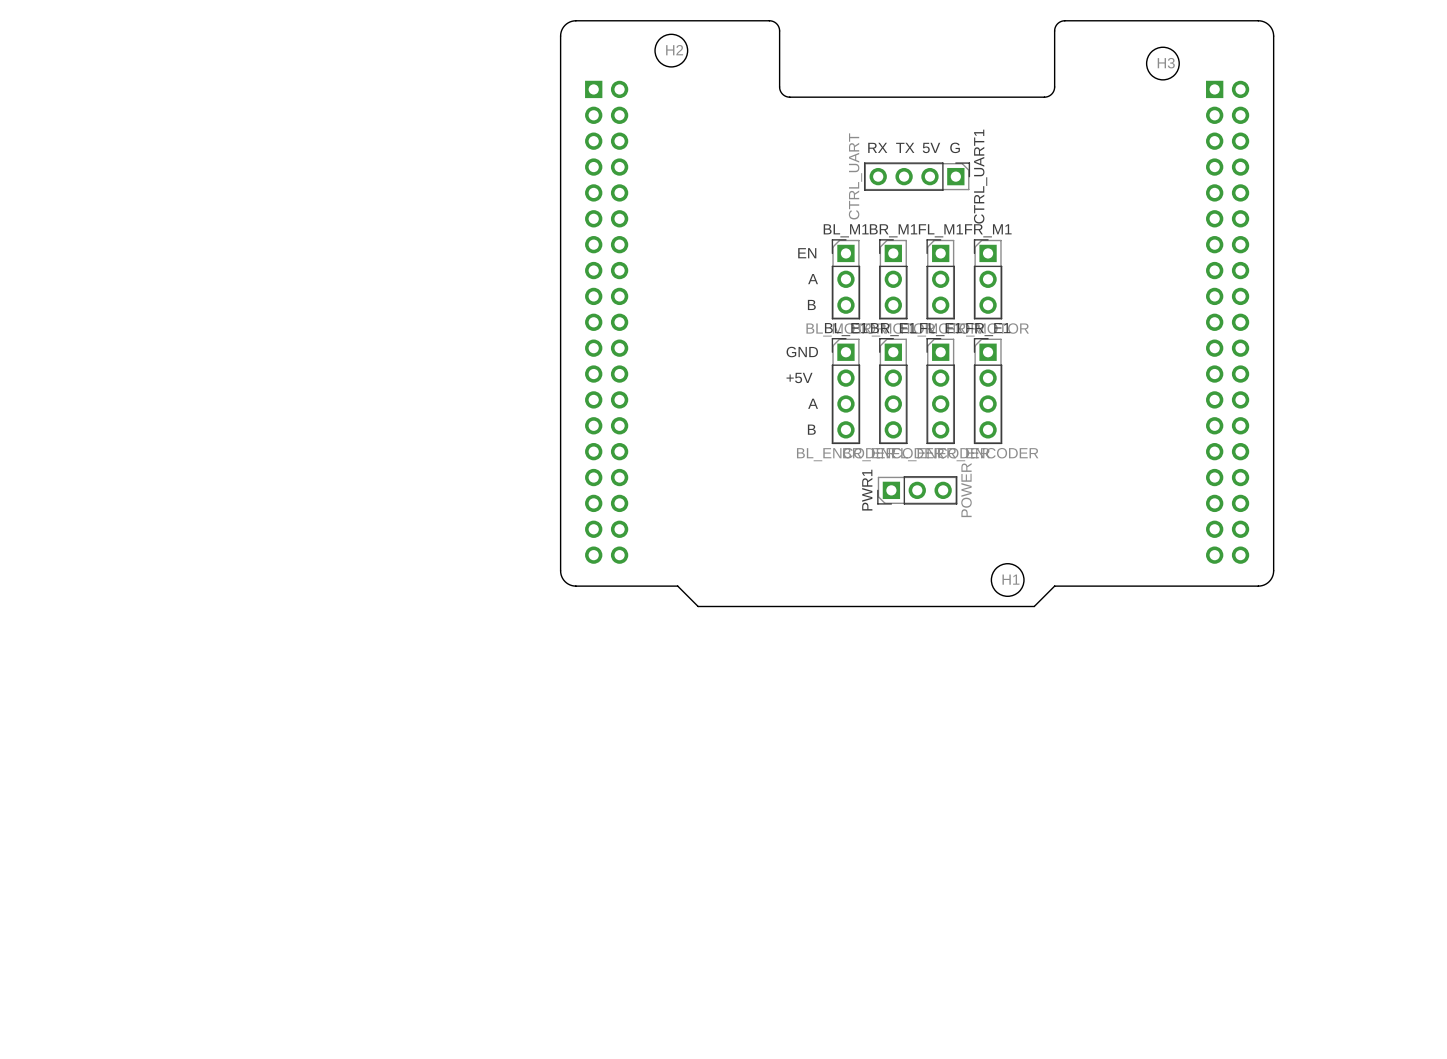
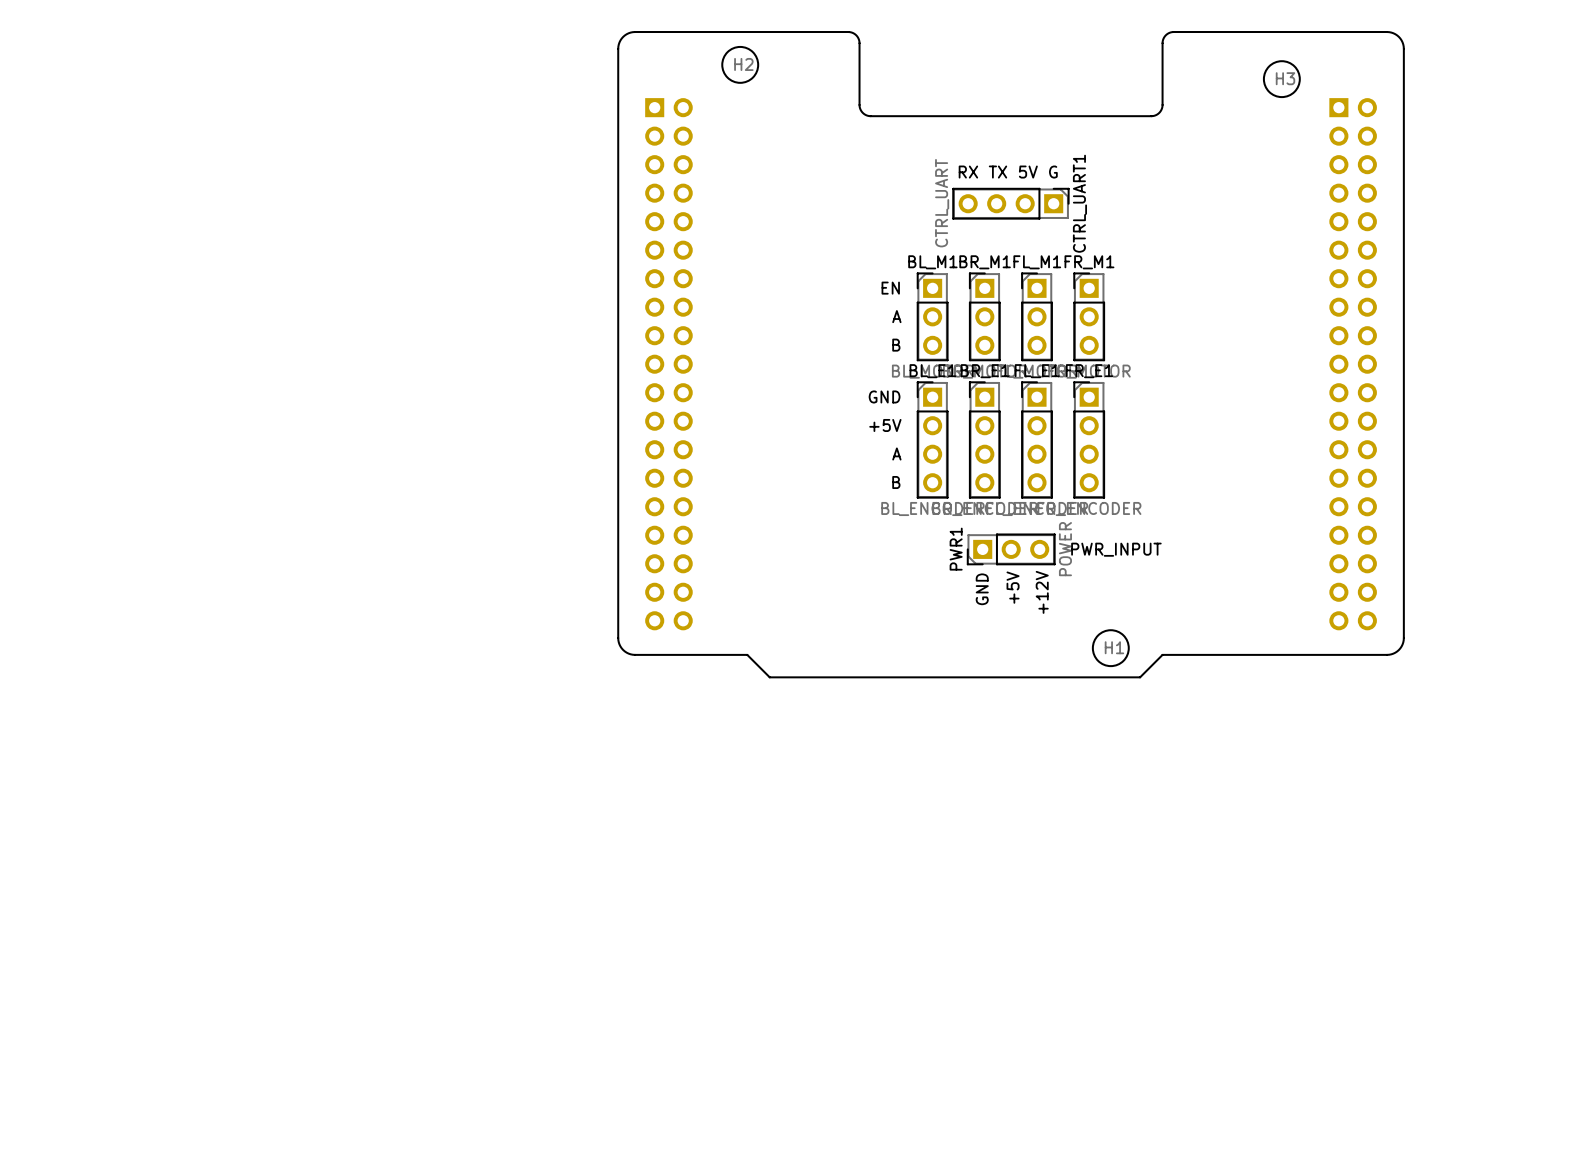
text: none -> PWR_INPUT (1116, 549)
text: none -> GND (982, 589)
text: none -> +5V (1013, 587)
text: none -> +12V (1042, 592)

